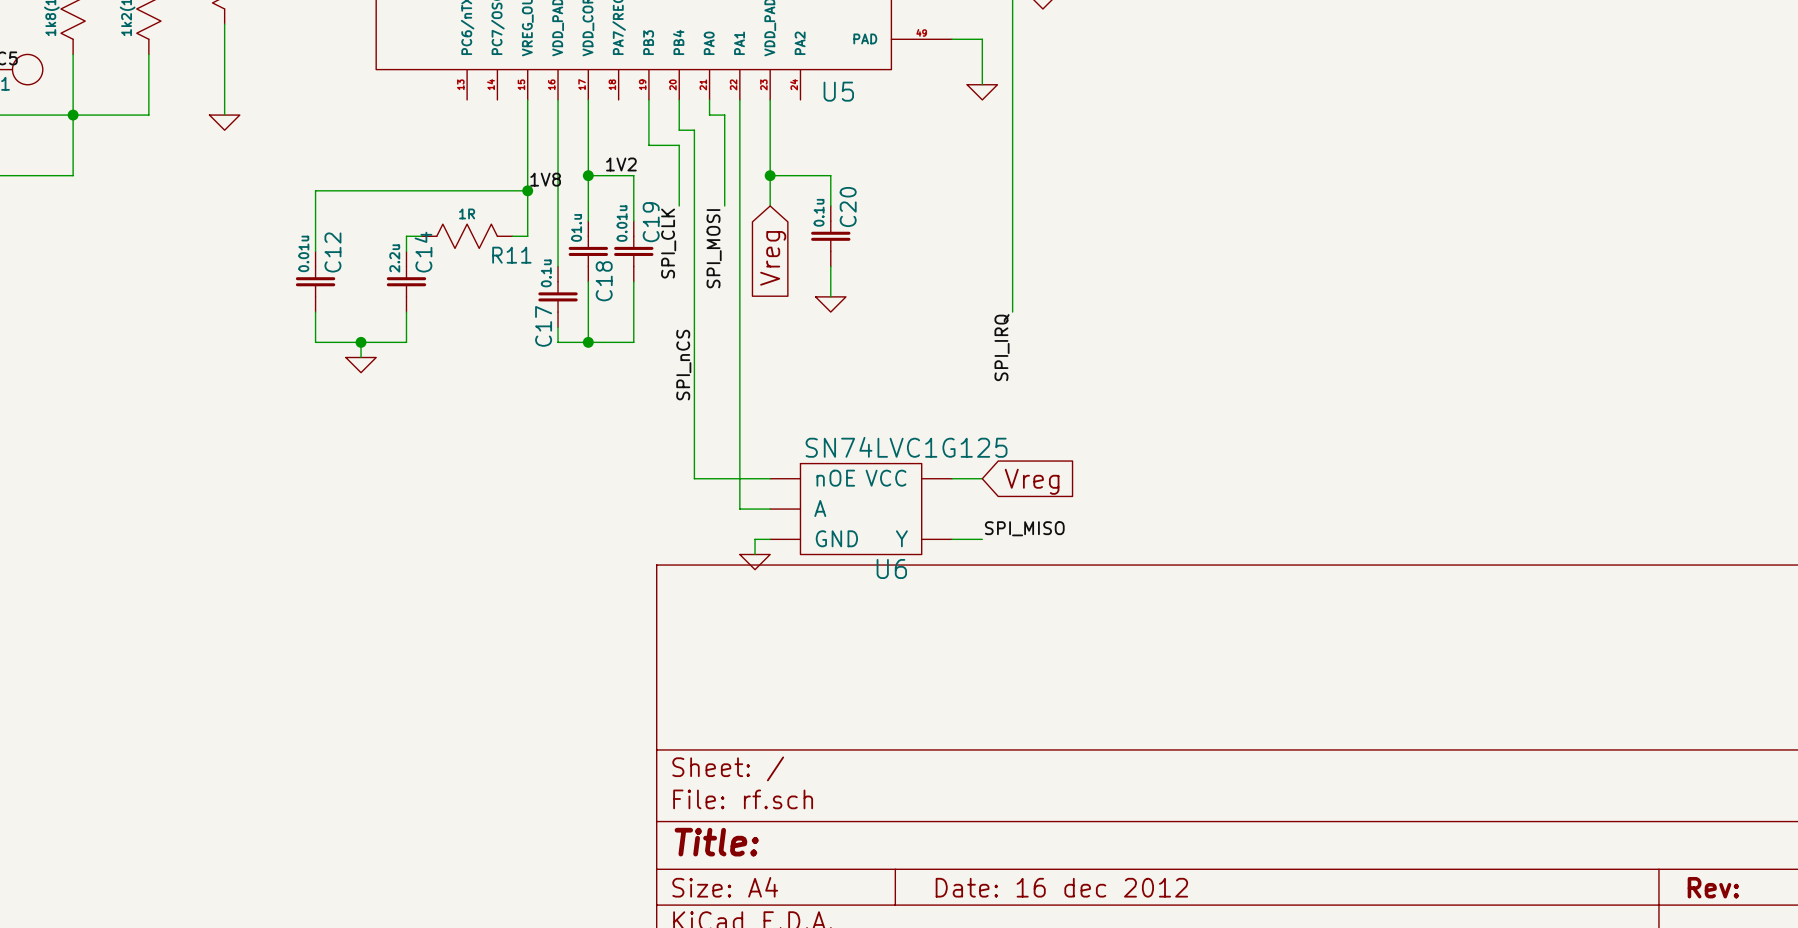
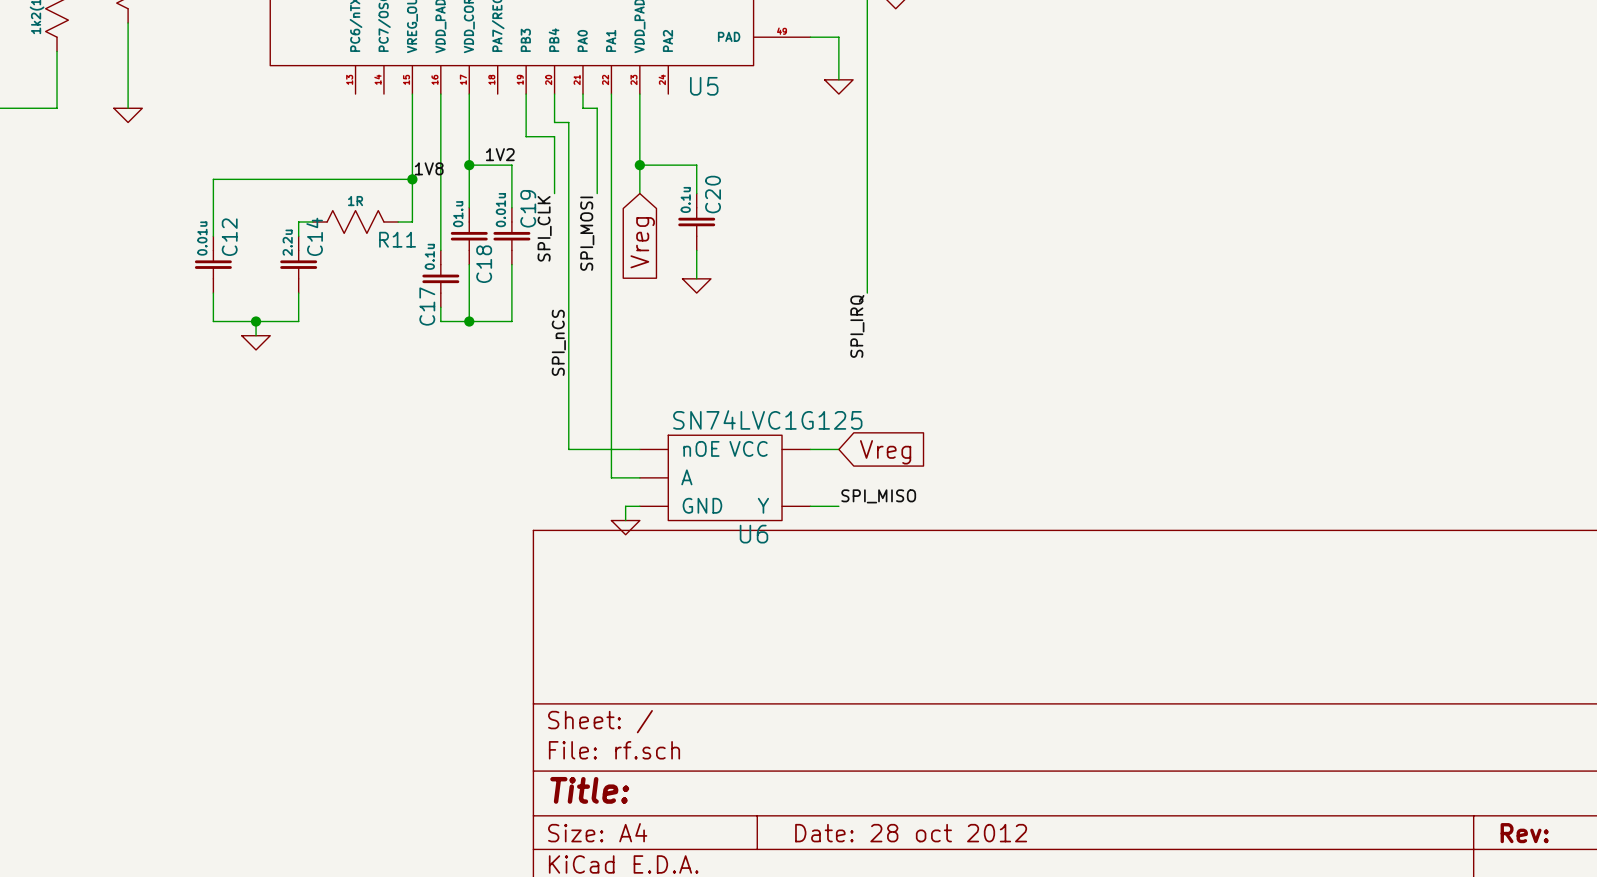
title block: Date: 16 dec 2012 (1061, 887) -> Date: 28 oct 2012 (911, 833)

